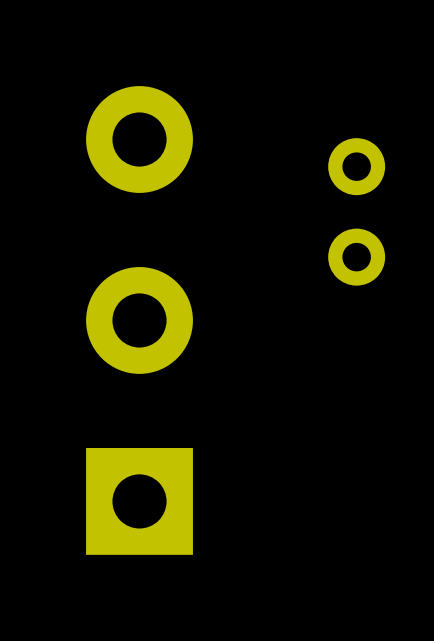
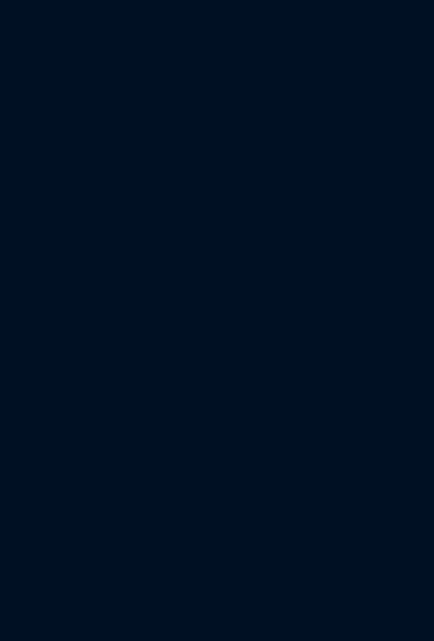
part: (356, 211) -> none
part: (139, 320) -> none

